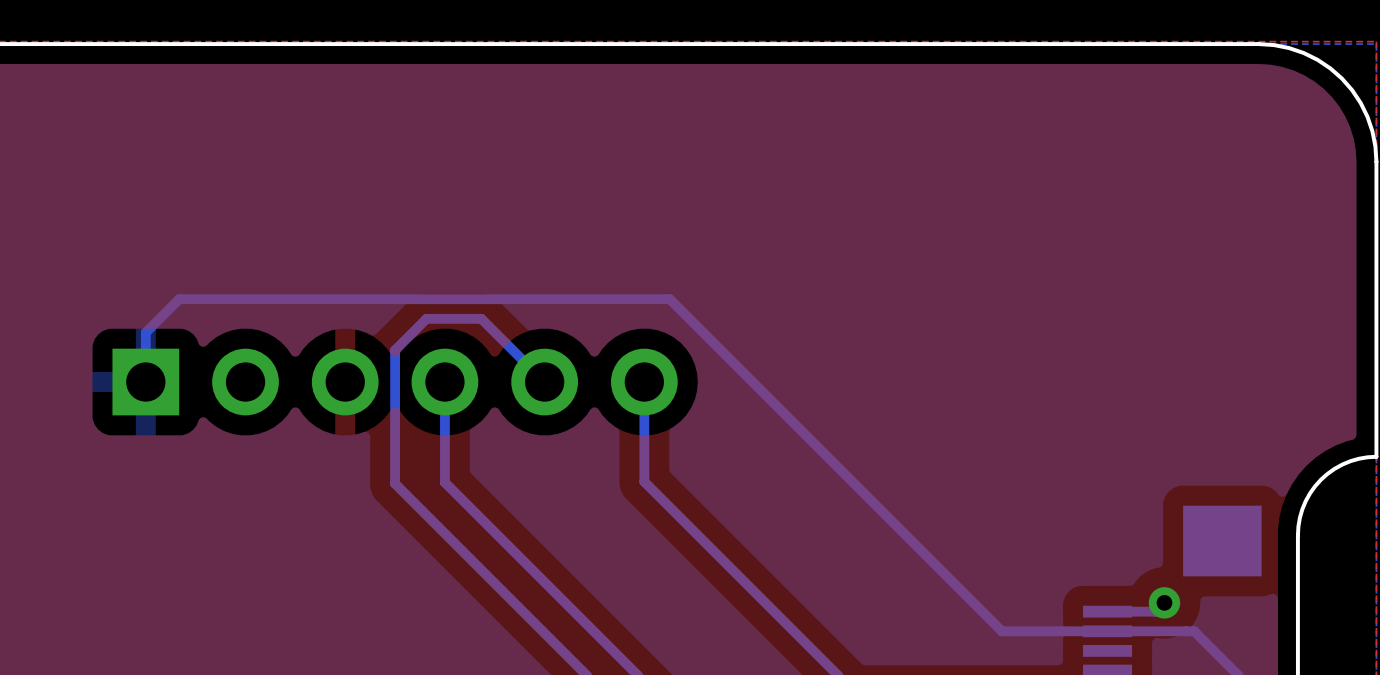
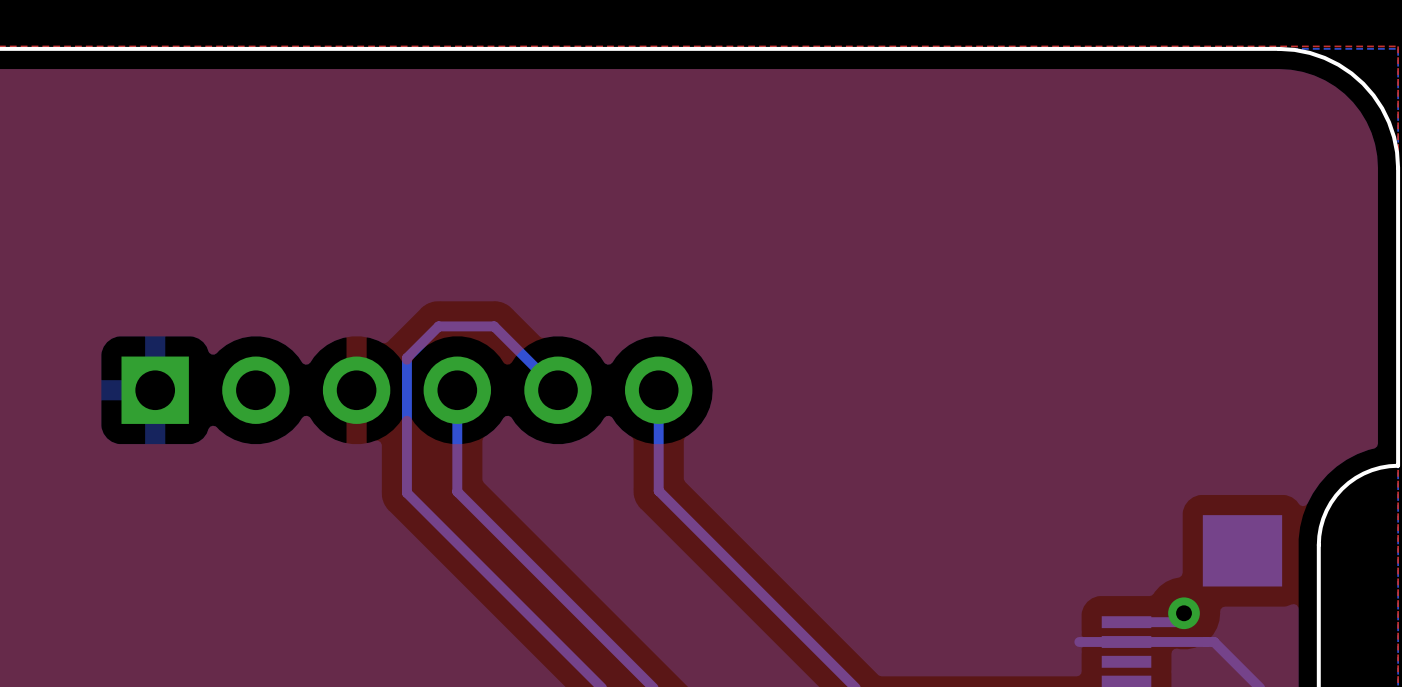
bottom track: (145, 382) (145, 332) (179, 299) (669, 299) (1001, 631) (1060, 631) -> none

